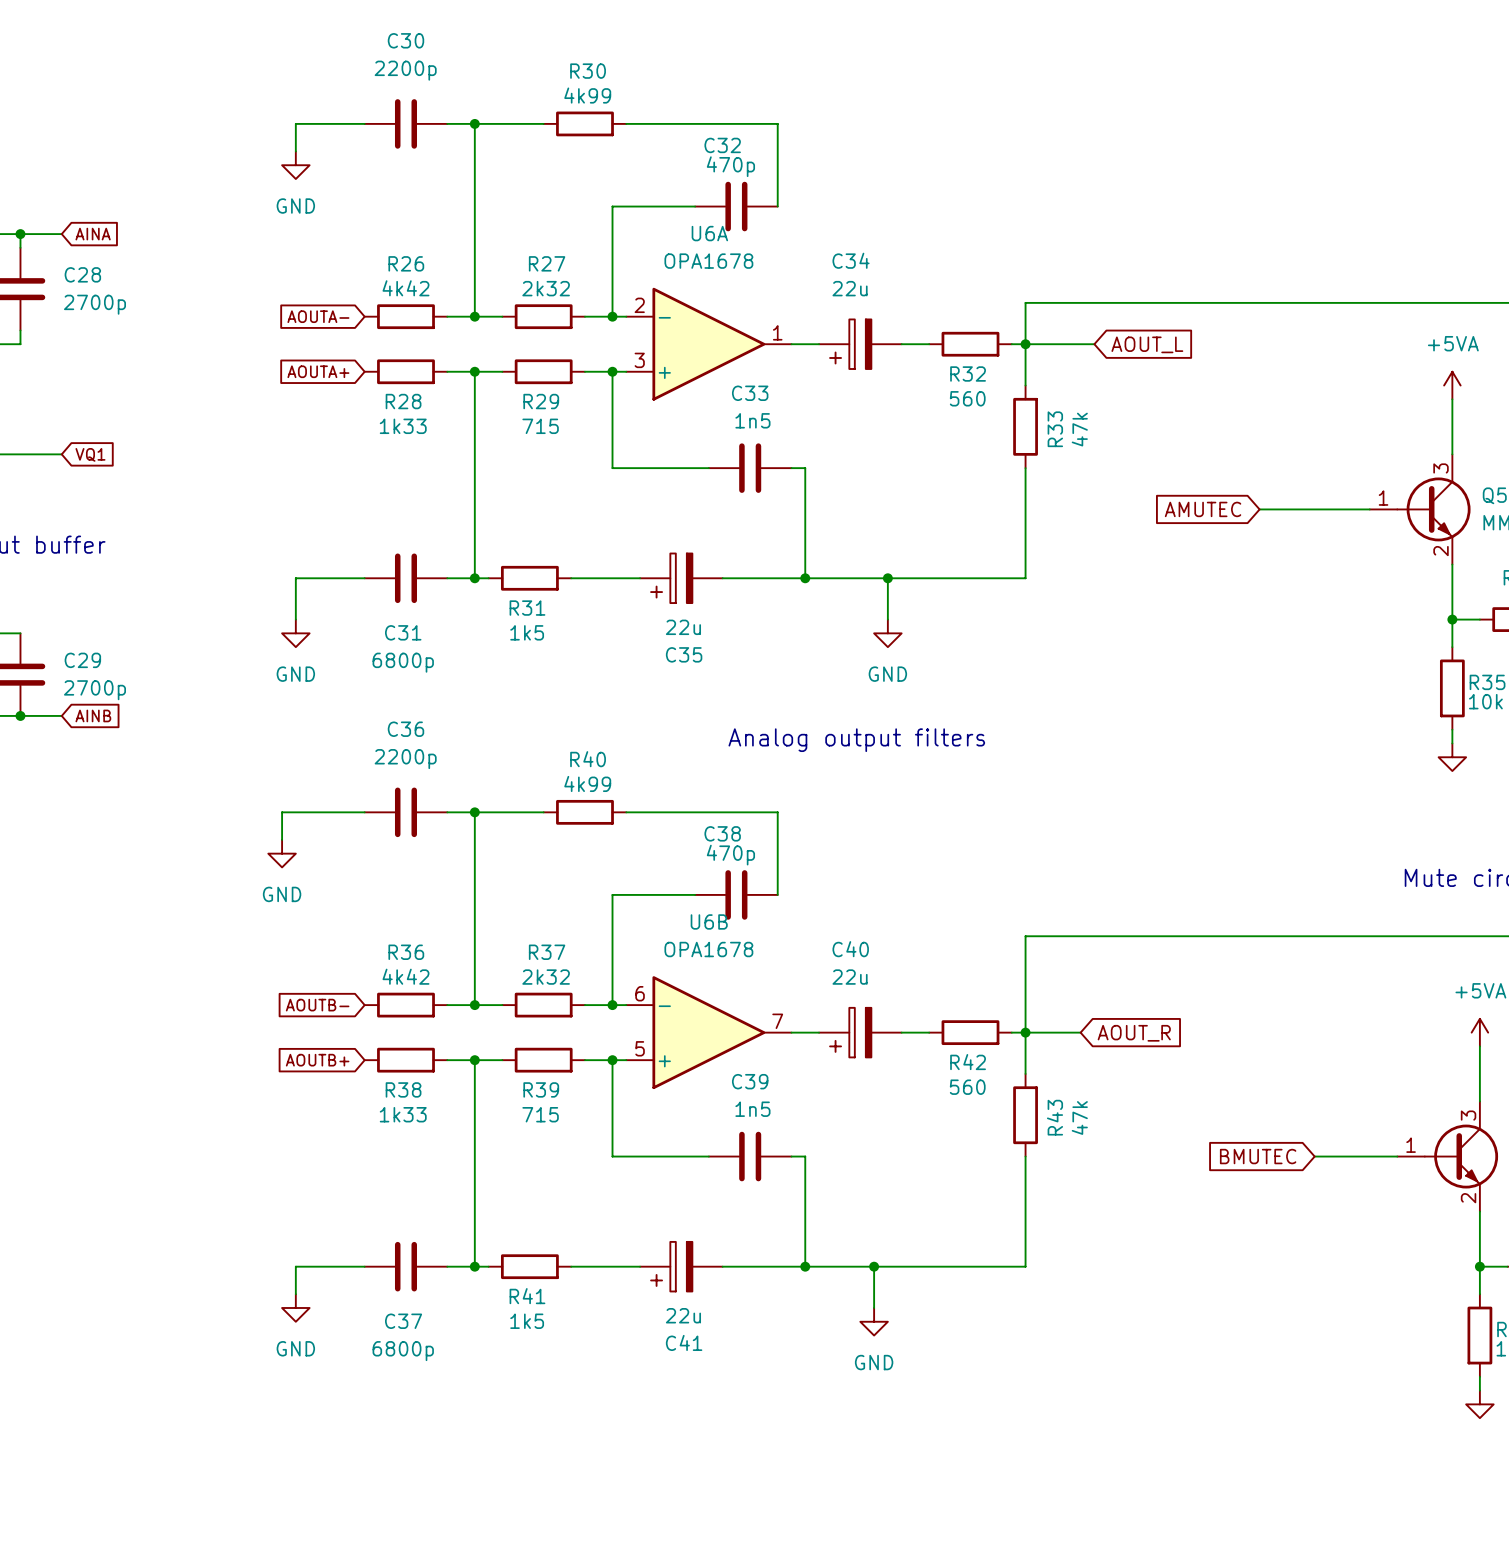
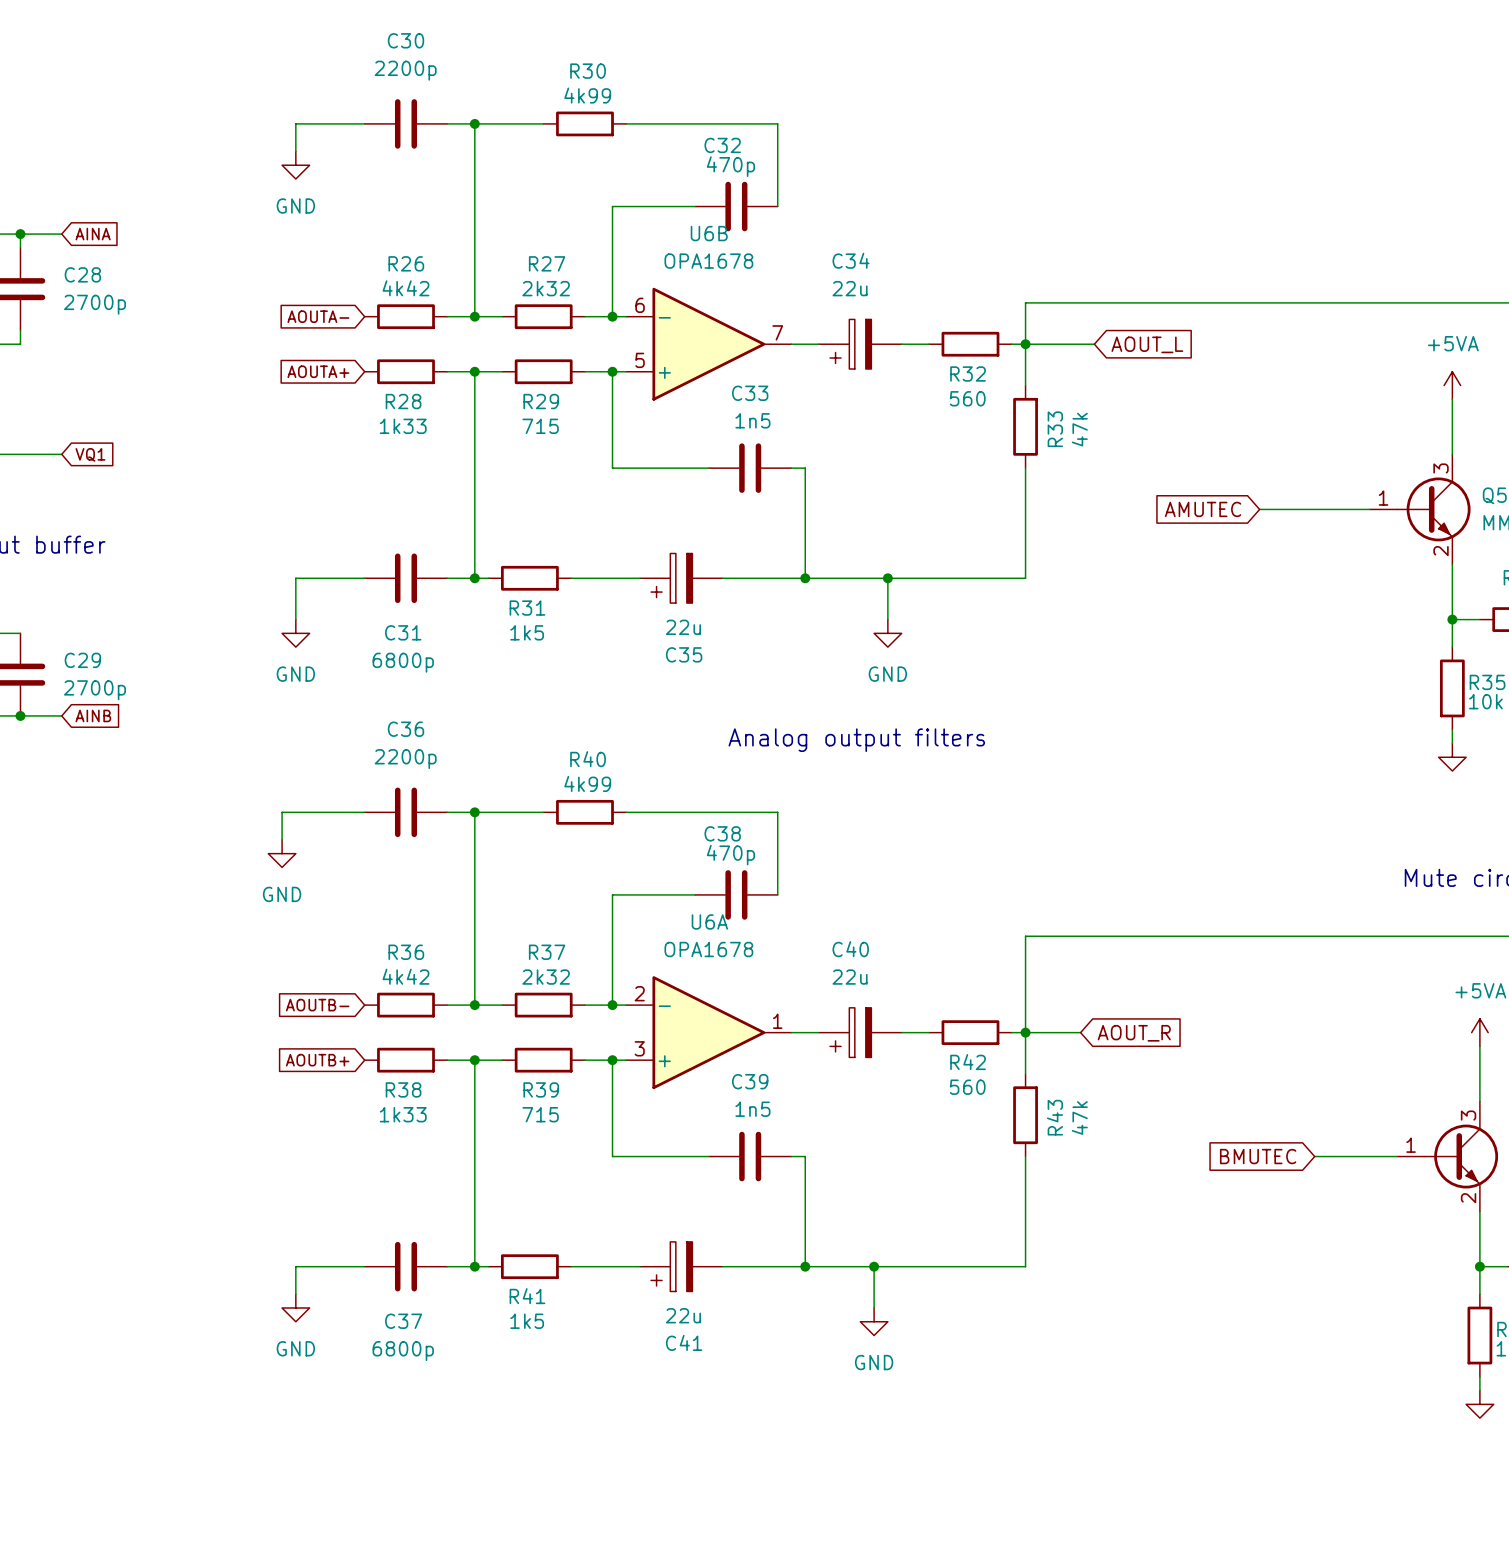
U6A position: (708, 344) -> (708, 1032)
U6B position: (708, 1032) -> (708, 344)

